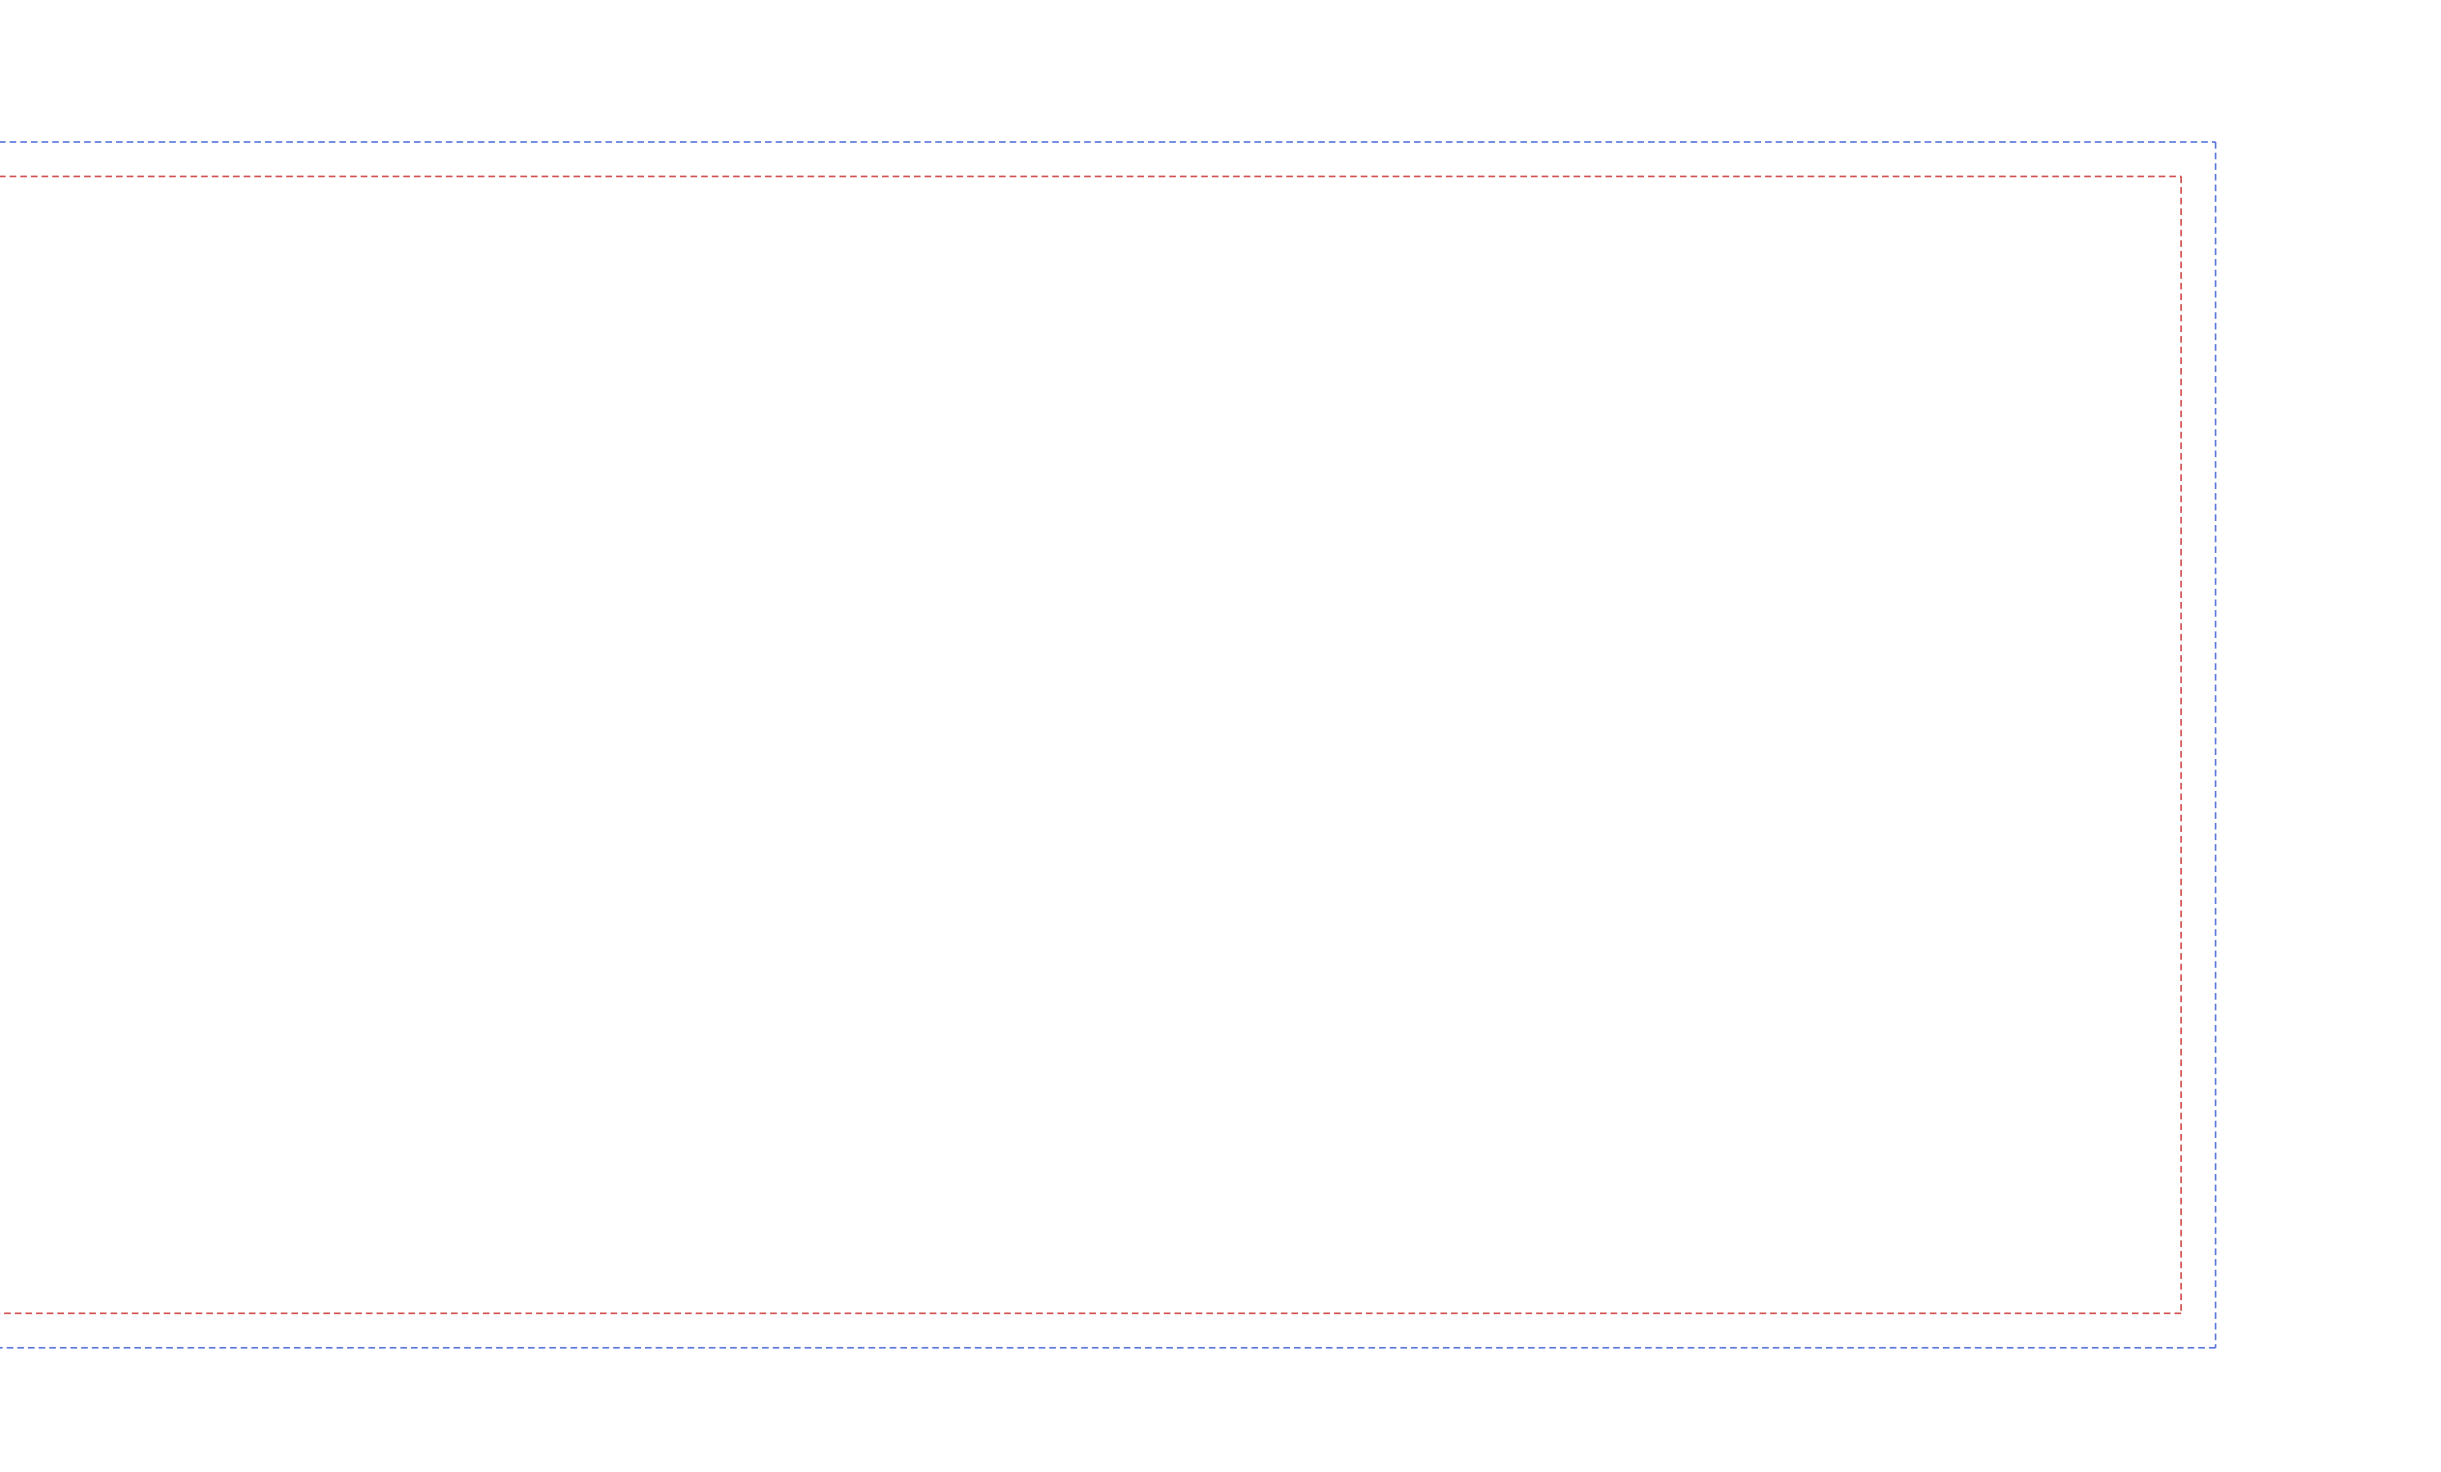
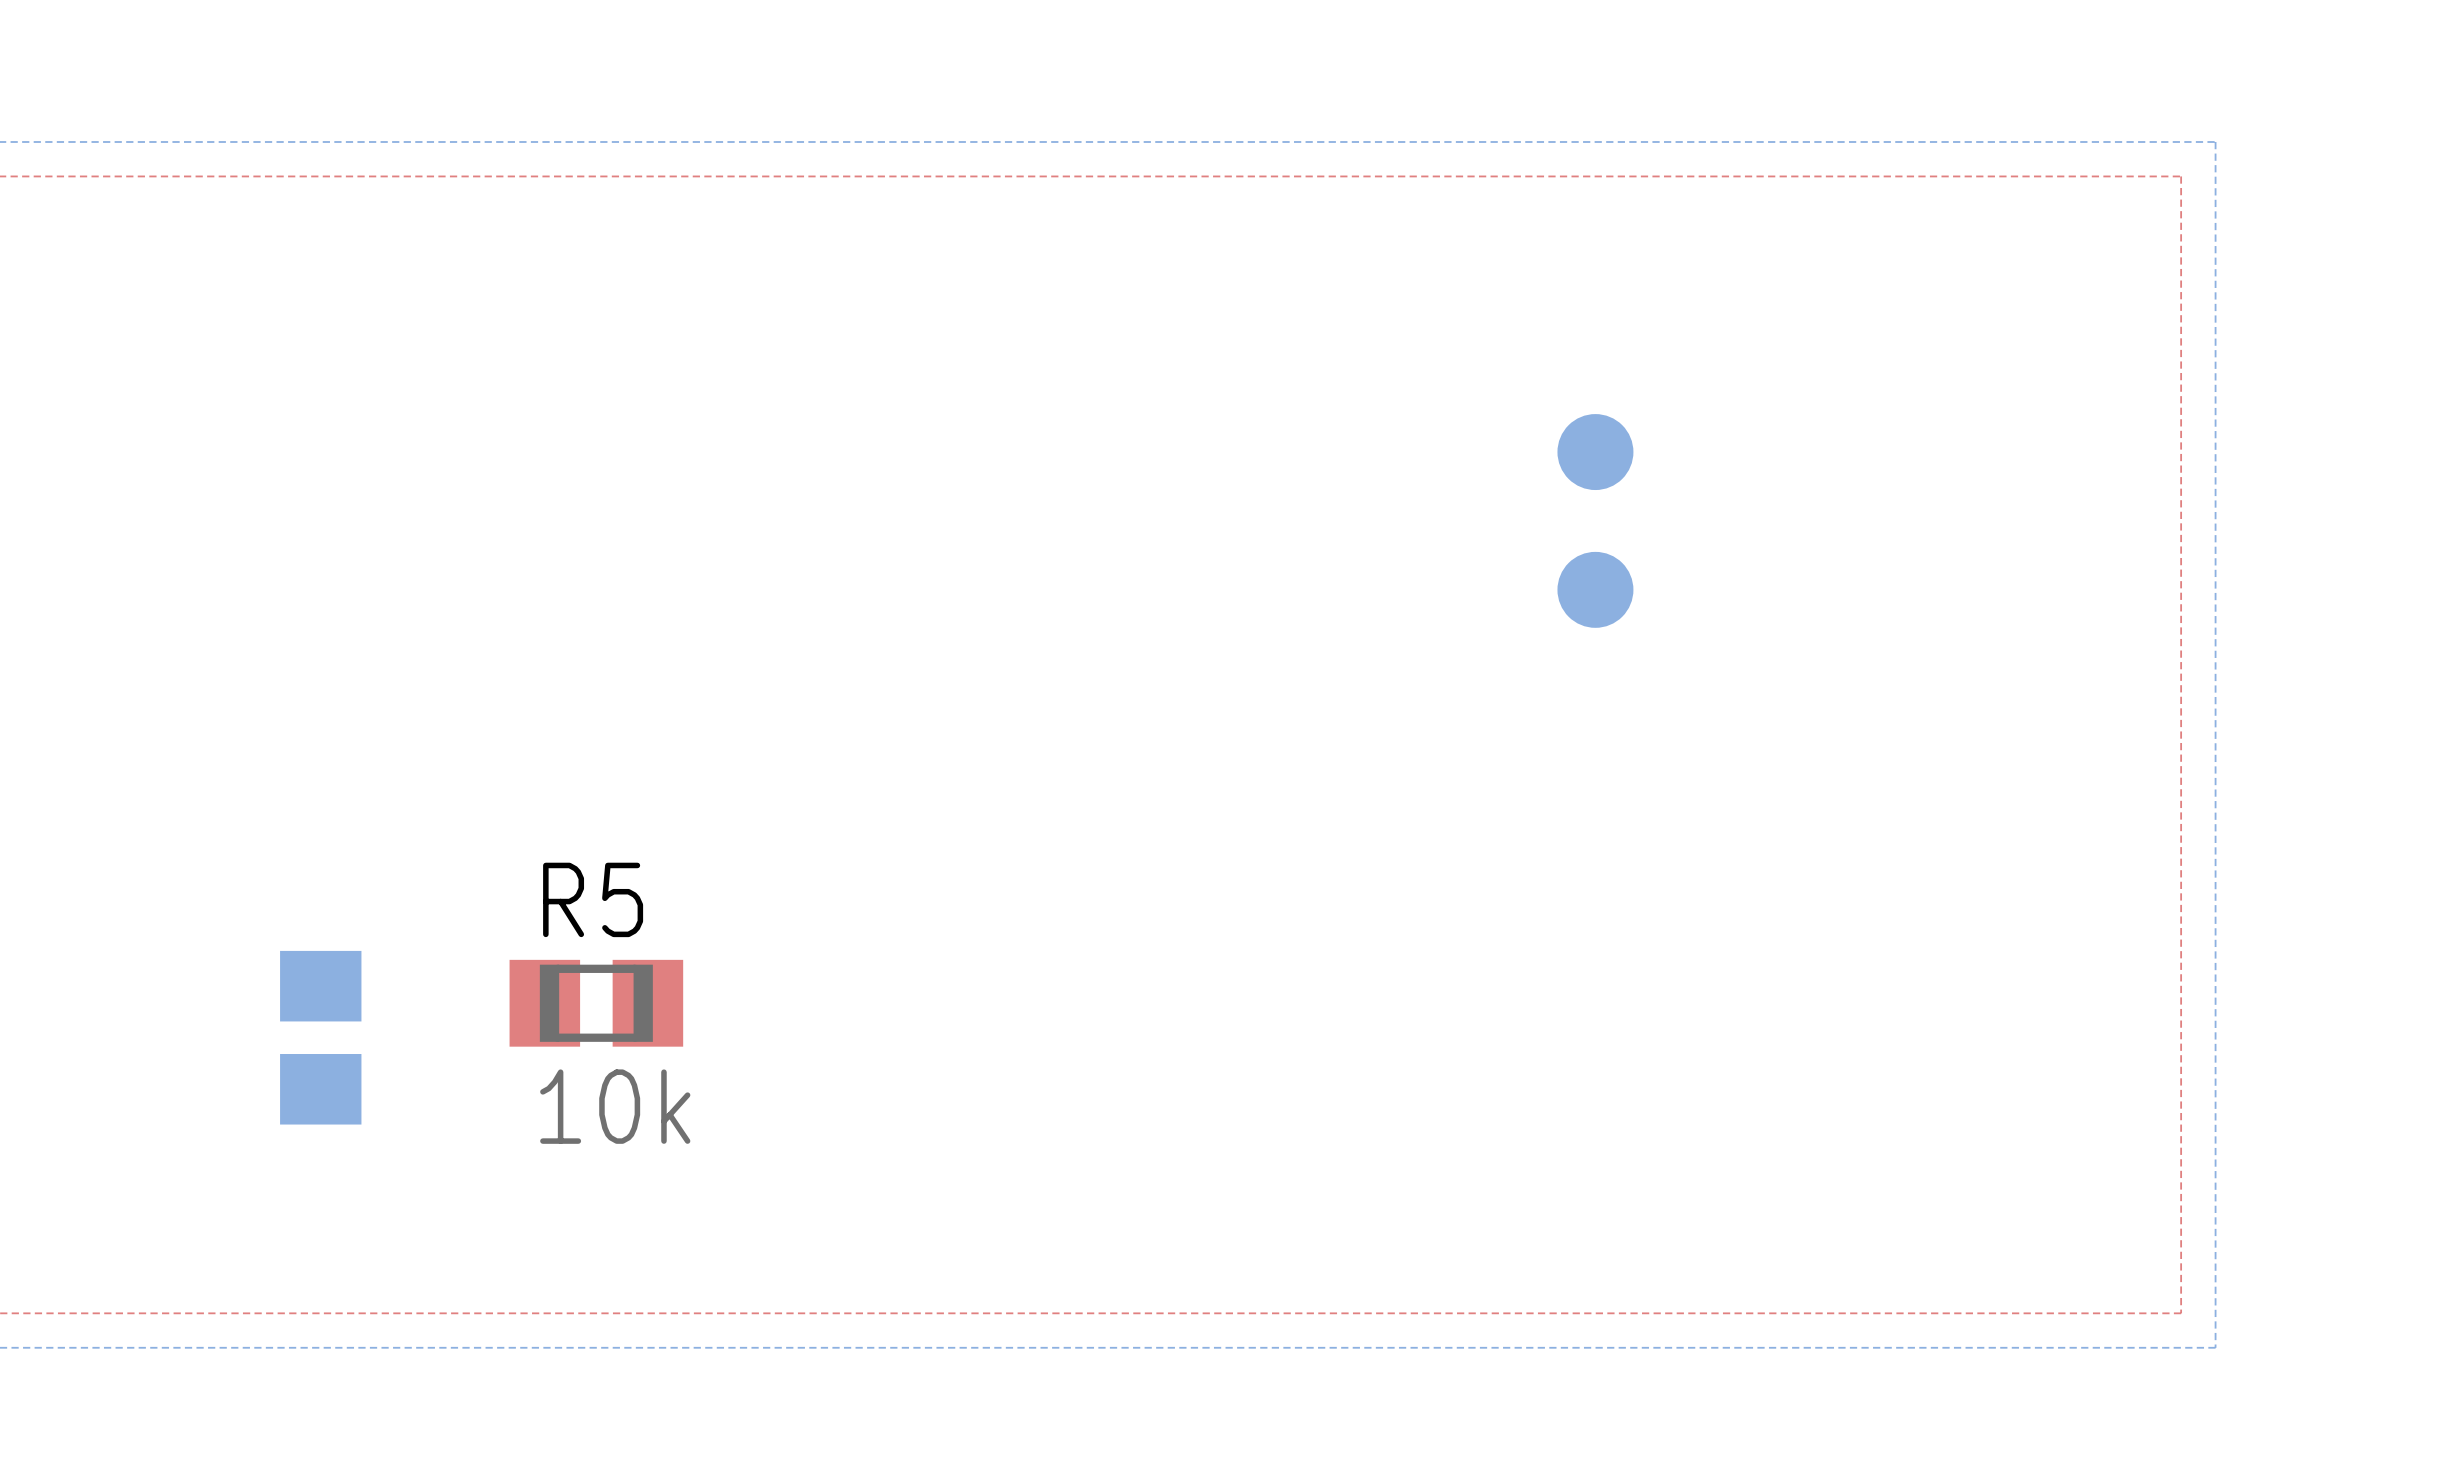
part: none -> (1595, 452)
part: none -> (1595, 589)
R5: none -> 10k (596, 1003)
part: none -> (320, 1037)

